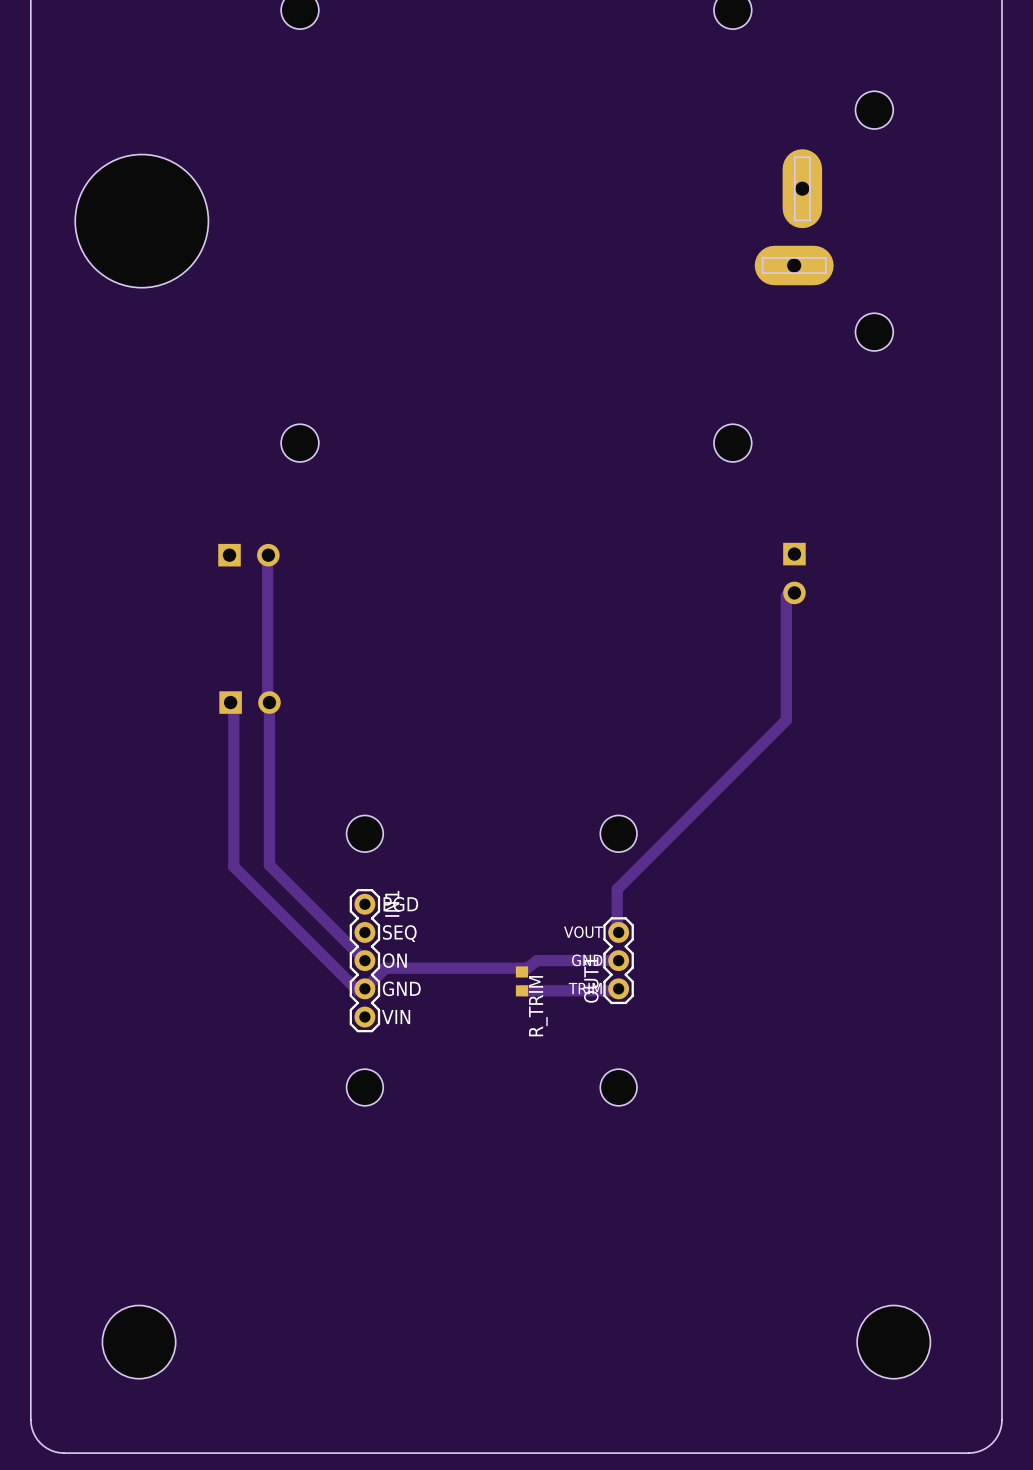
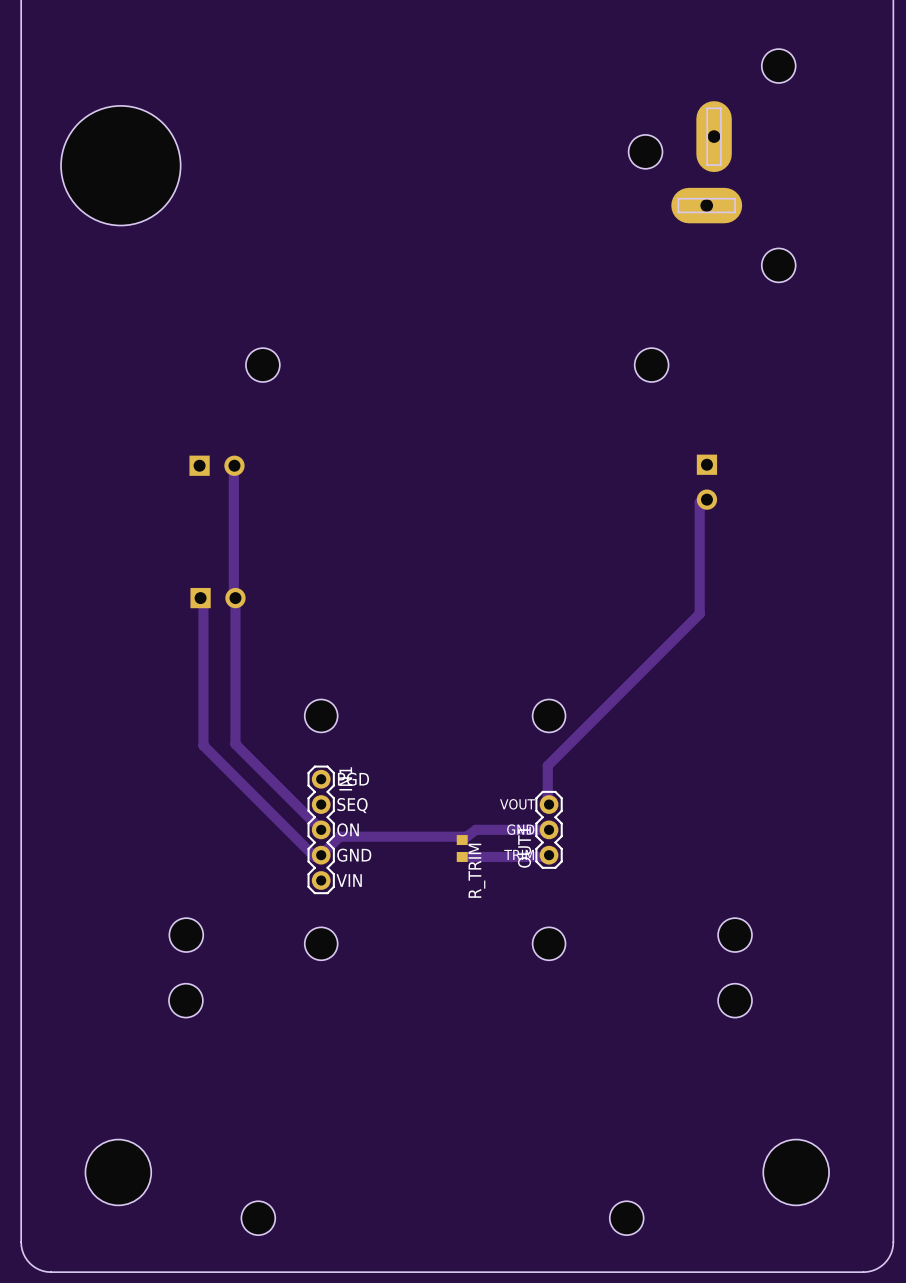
hole: none -> (645, 151)
hole: none -> (186, 935)
hole: none -> (735, 935)
hole: none -> (185, 1000)
hole: none -> (735, 1000)
hole: none -> (258, 1218)
hole: none -> (626, 1218)

